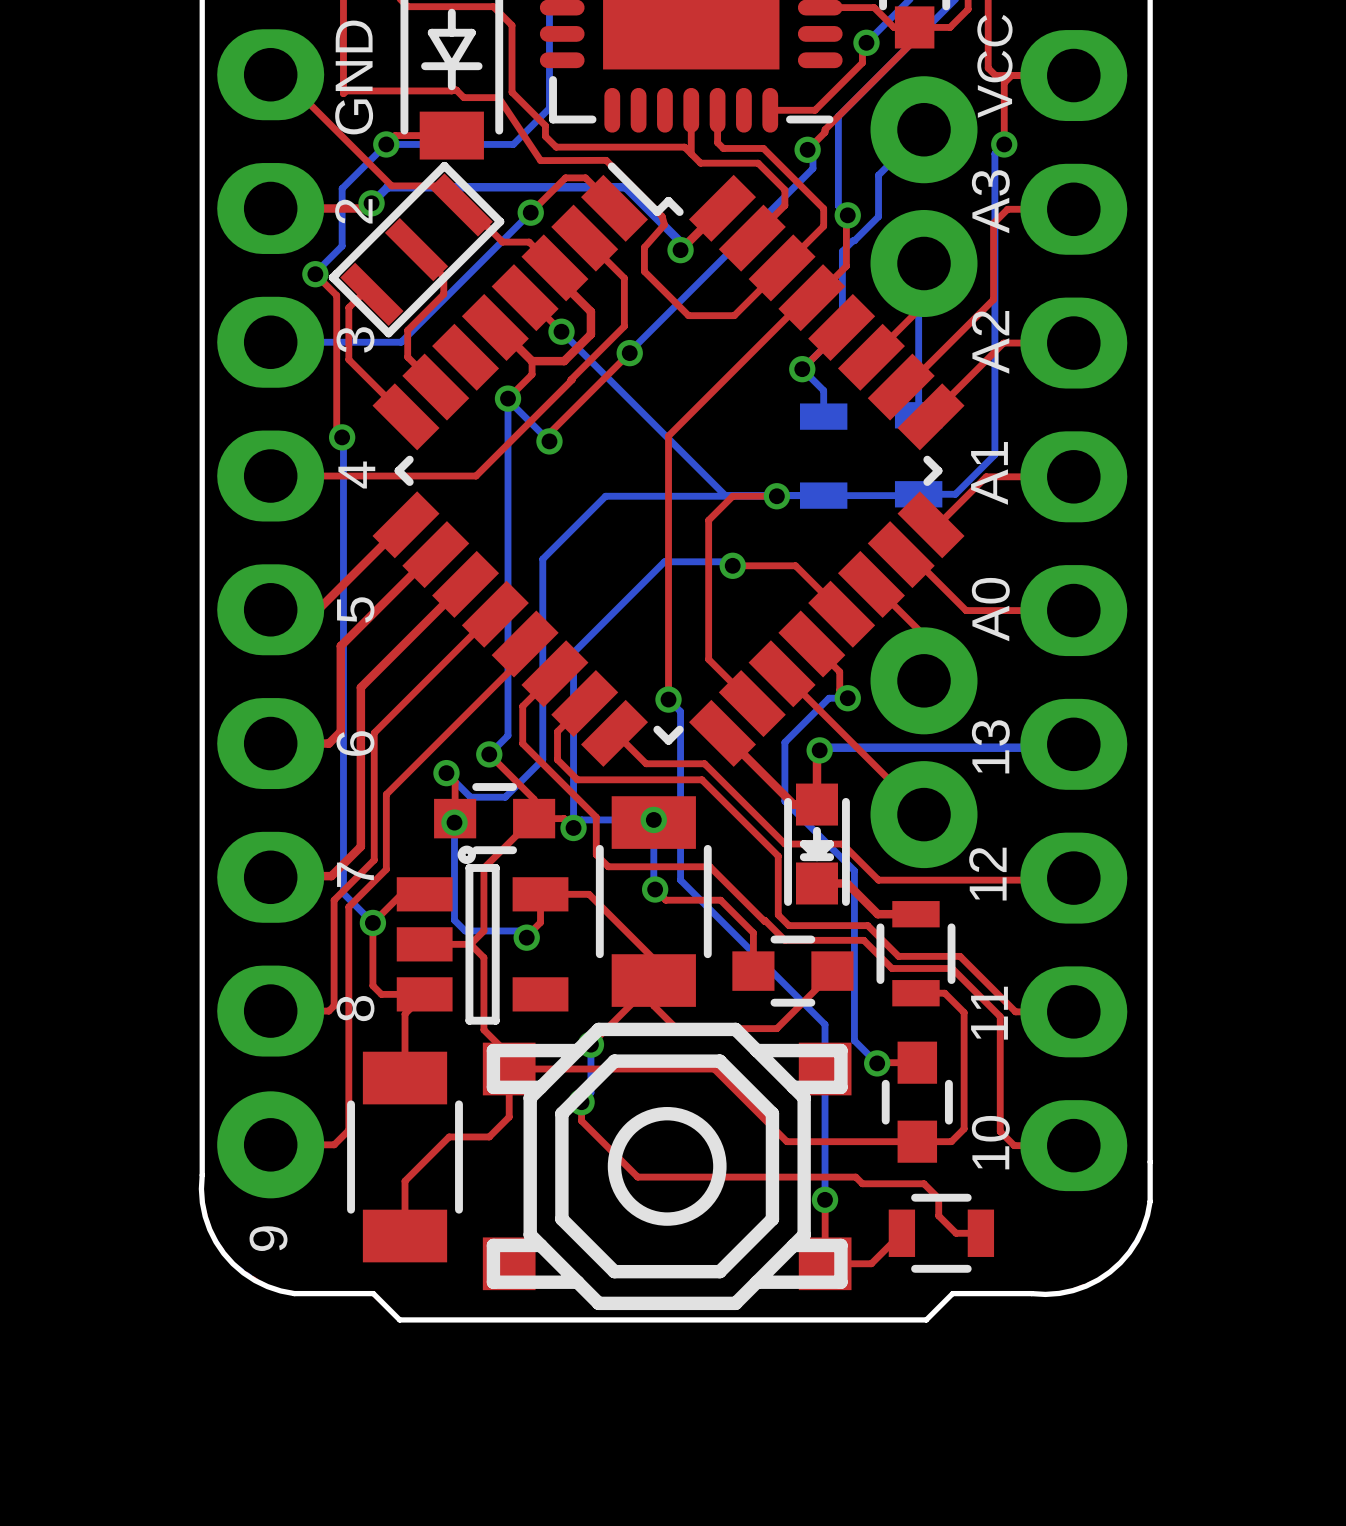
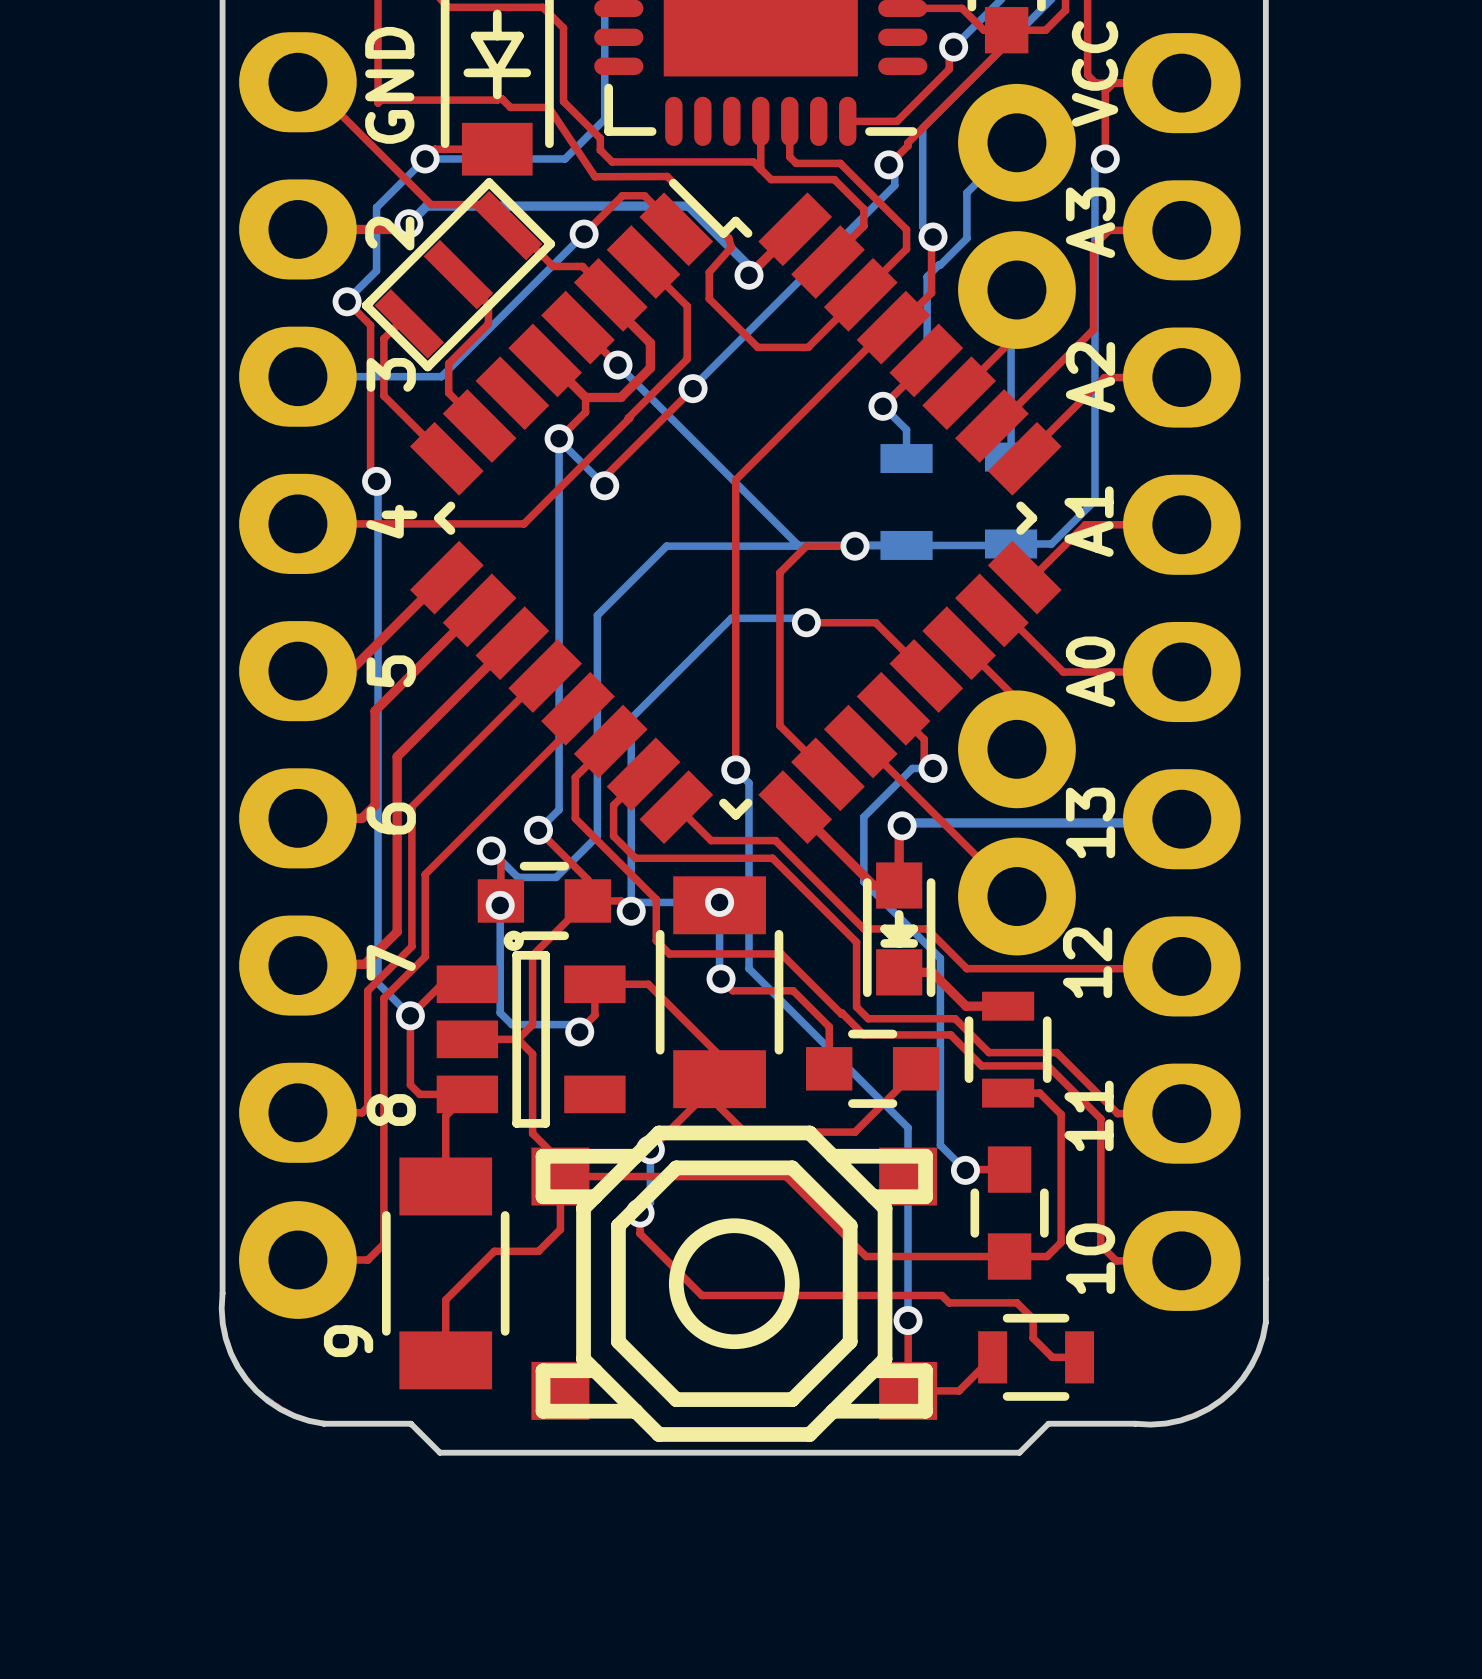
text position: 9 (268, 1238) -> 9 (348, 1341)

